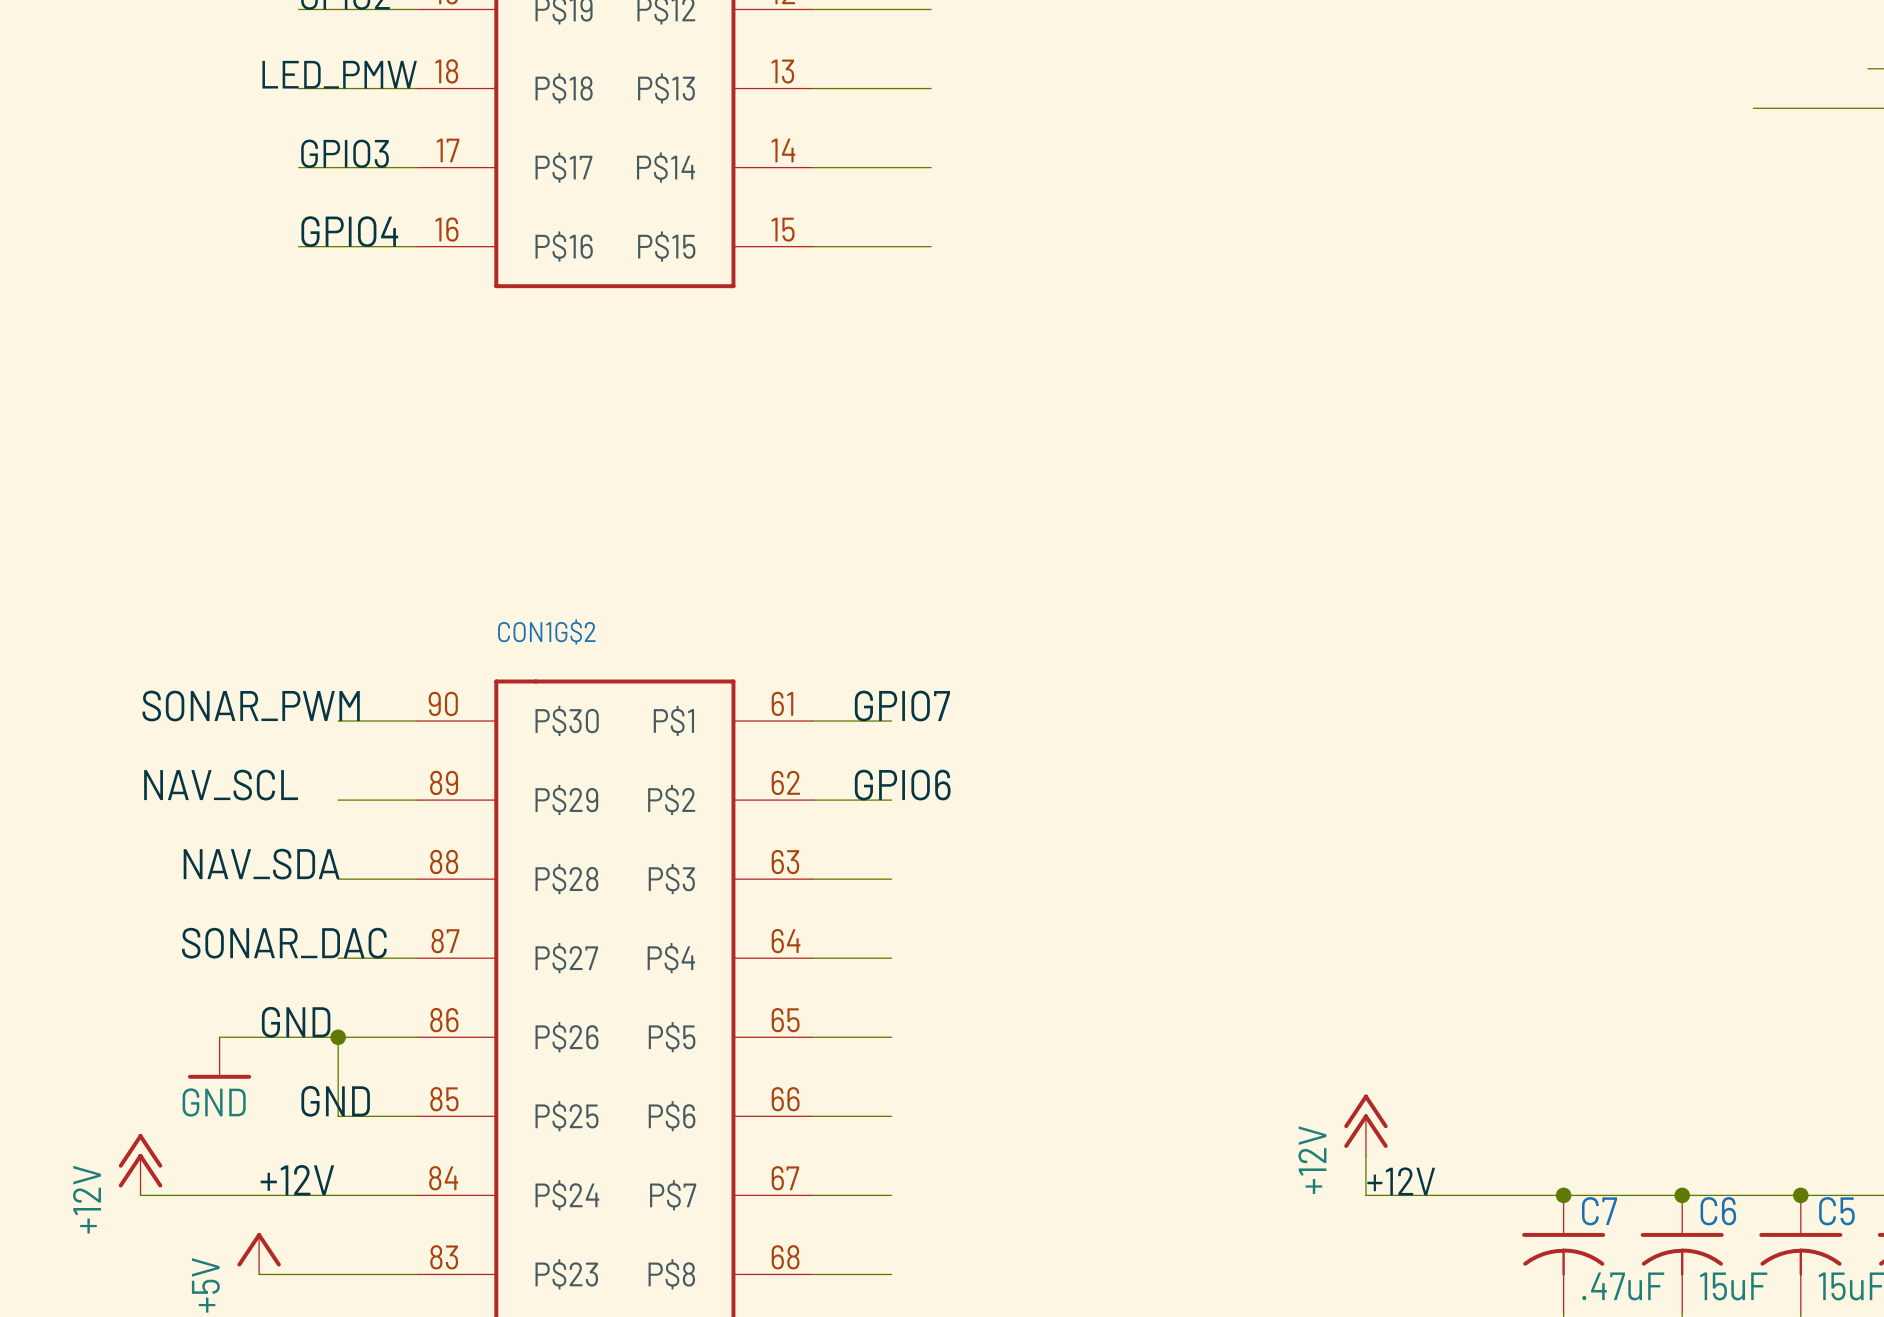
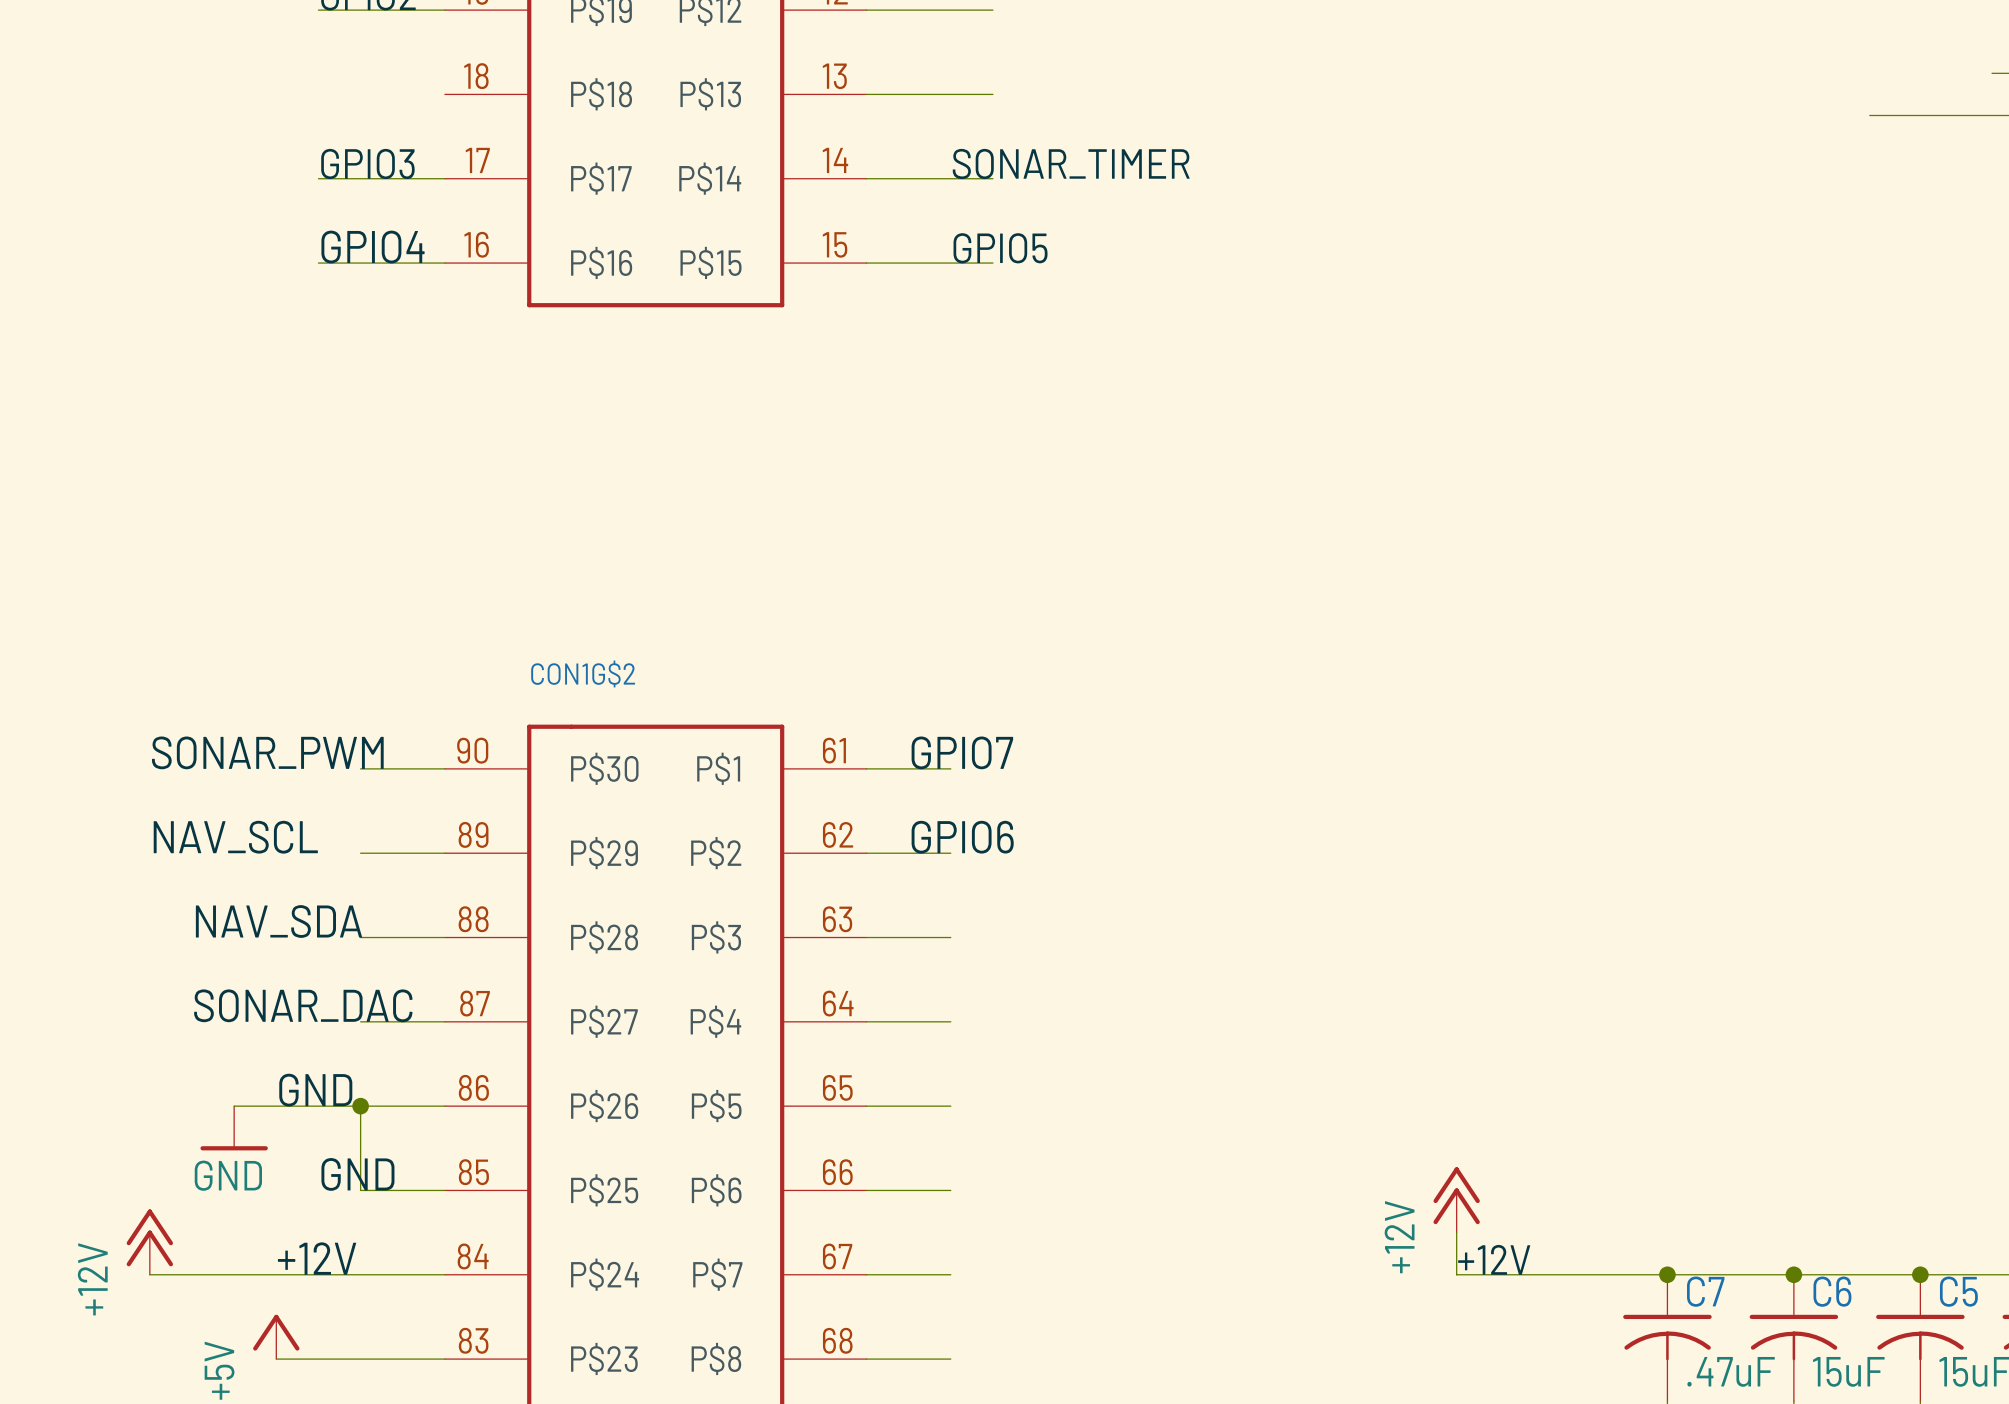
label: LED_PMW (339, 74) -> none
wire: (298, 88) (417, 88) -> none
label: none -> SONAR_TIMER (1071, 163)
label: none -> GPIO5 (1000, 248)

